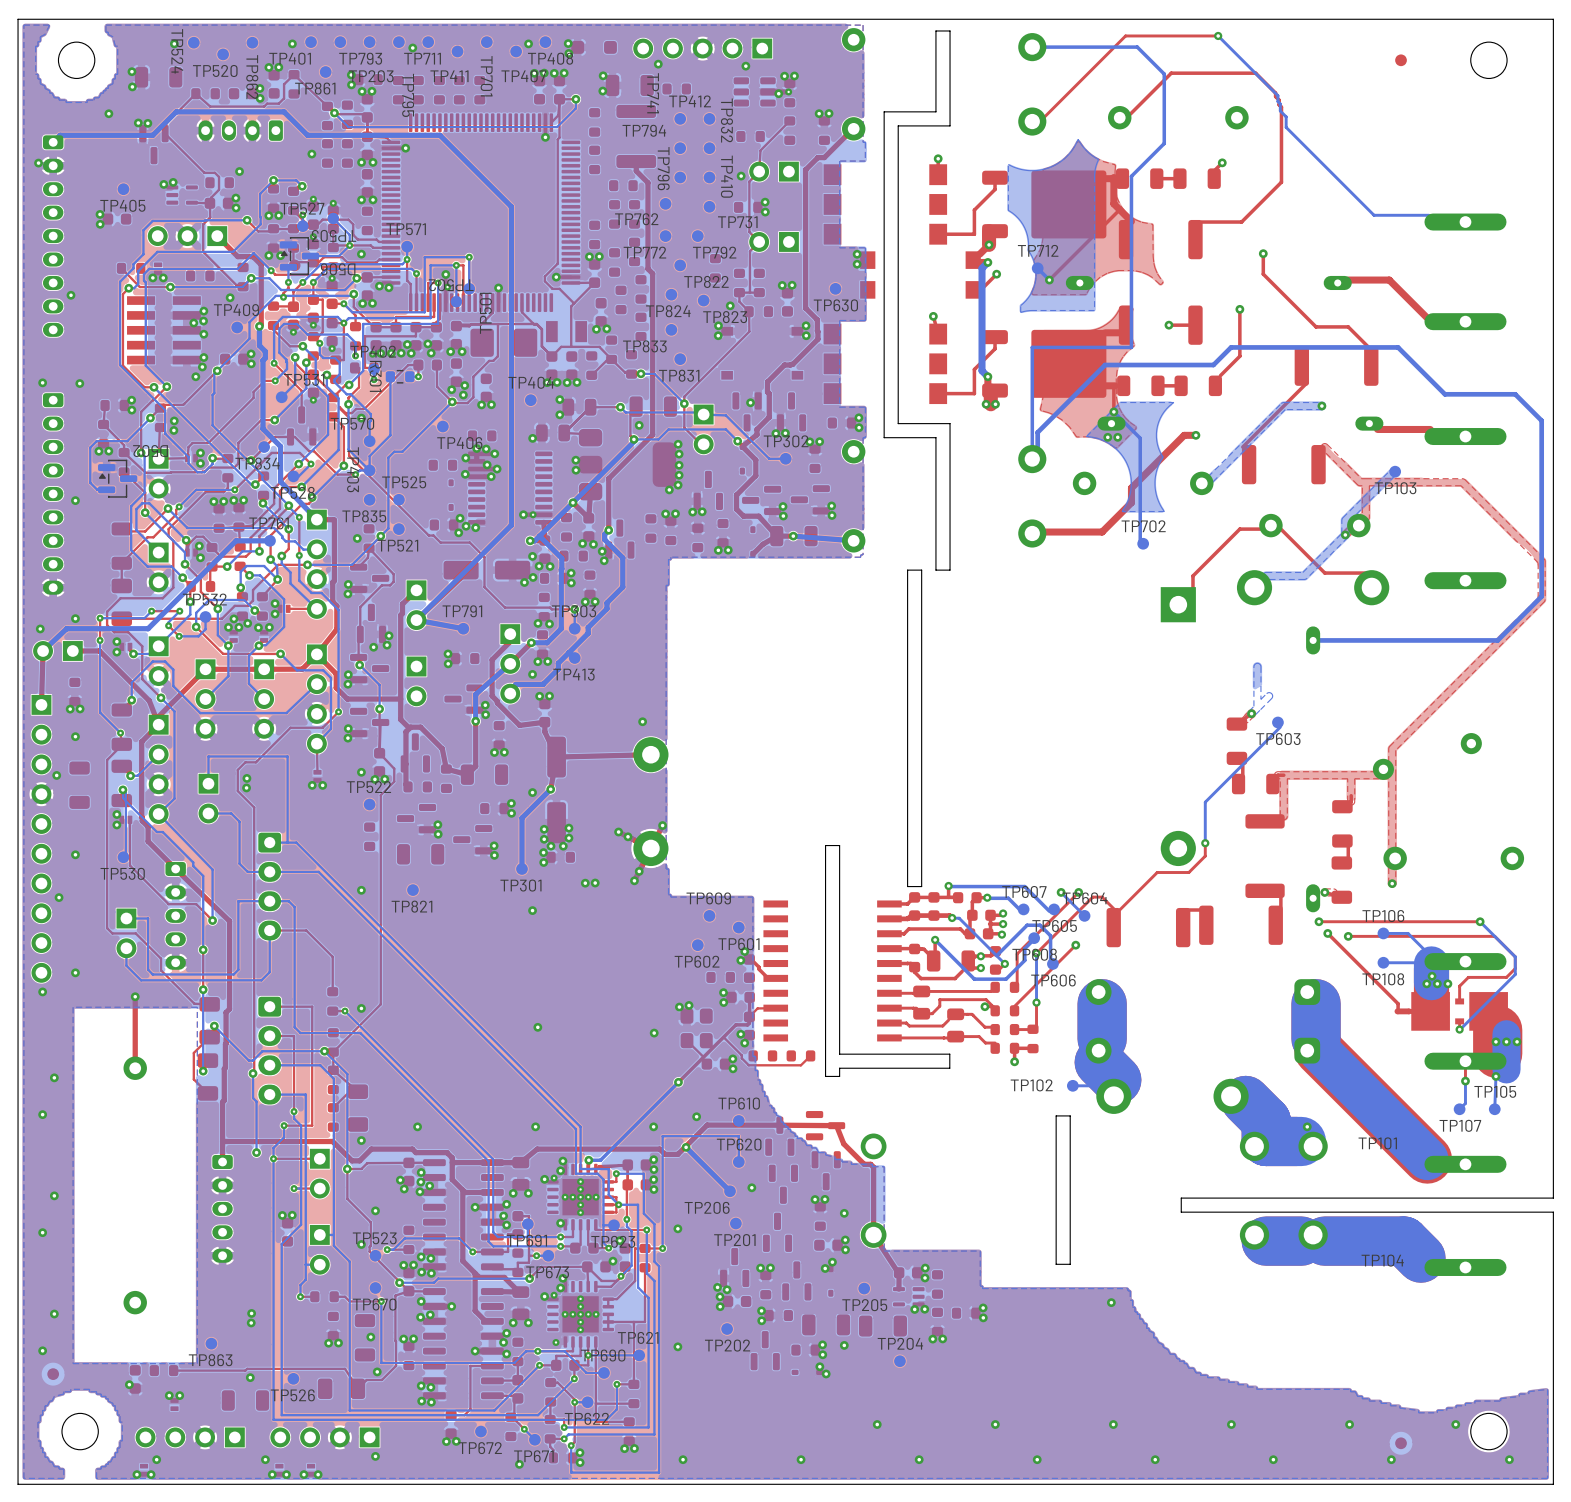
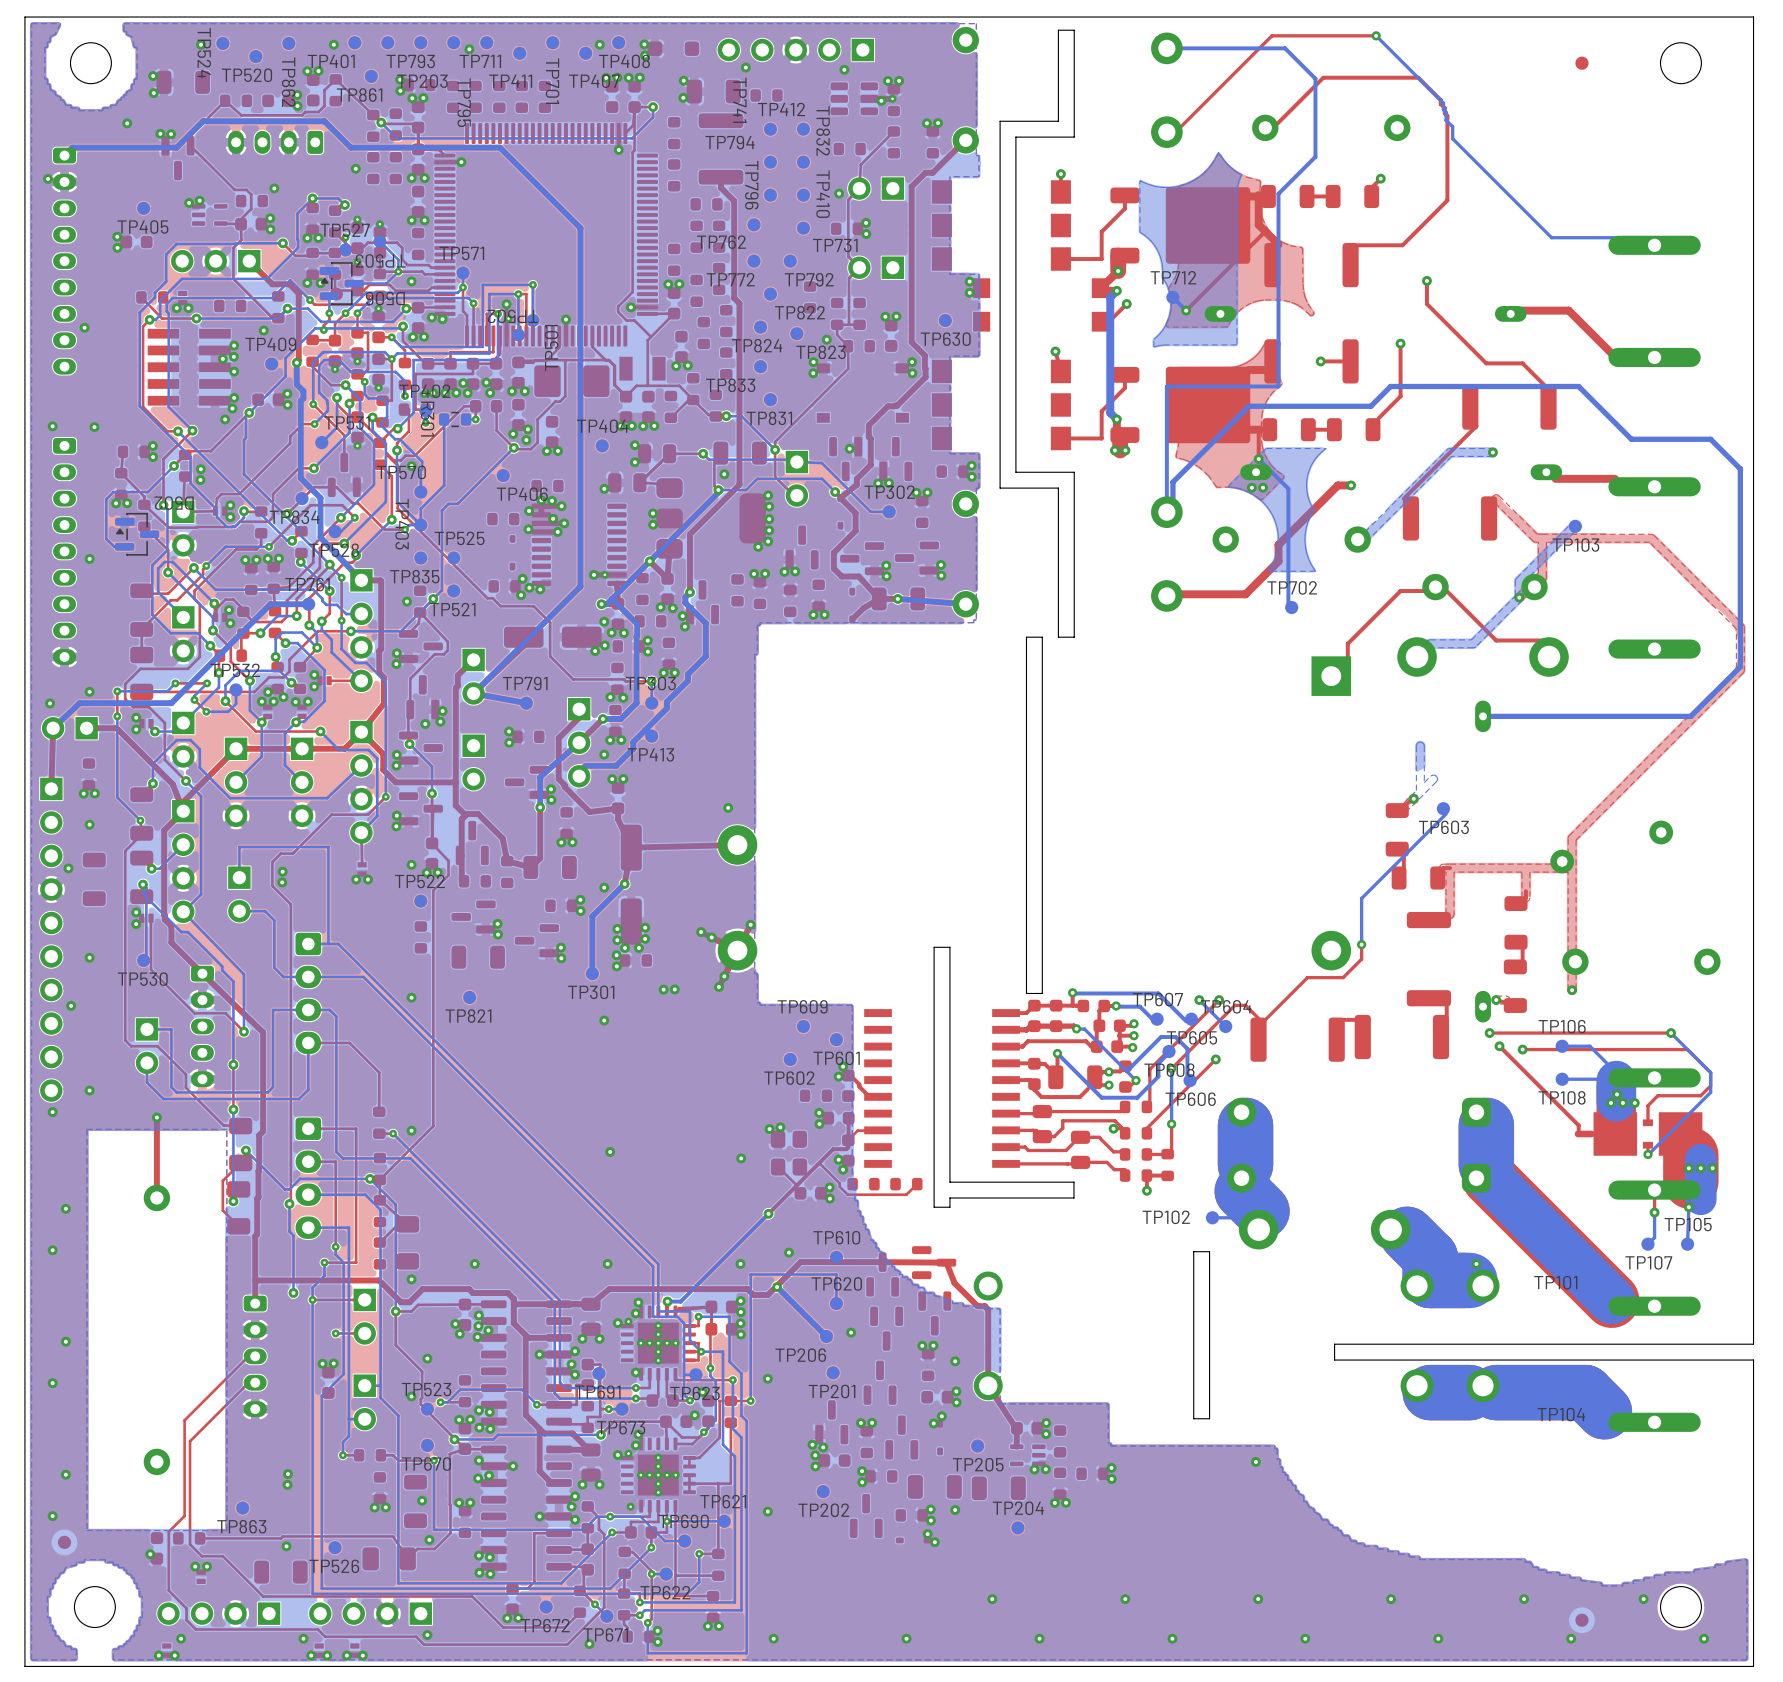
top track: none -> (255, 1356) (248, 1356) (184, 1420) (184, 1516) (168, 1531) (168, 1590) (186, 1608) (186, 1620) (195, 1629) (317, 1629) (325, 1636) (416, 1636) (424, 1644) (567, 1644) (604, 1607) (604, 1534) (598, 1529) (598, 1517) (587, 1506)
top track: none -> (255, 1382) (248, 1382) (190, 1441) (190, 1544) (201, 1556) (222, 1556) (263, 1596) (472, 1596) (503, 1627) (564, 1627) (579, 1612)

